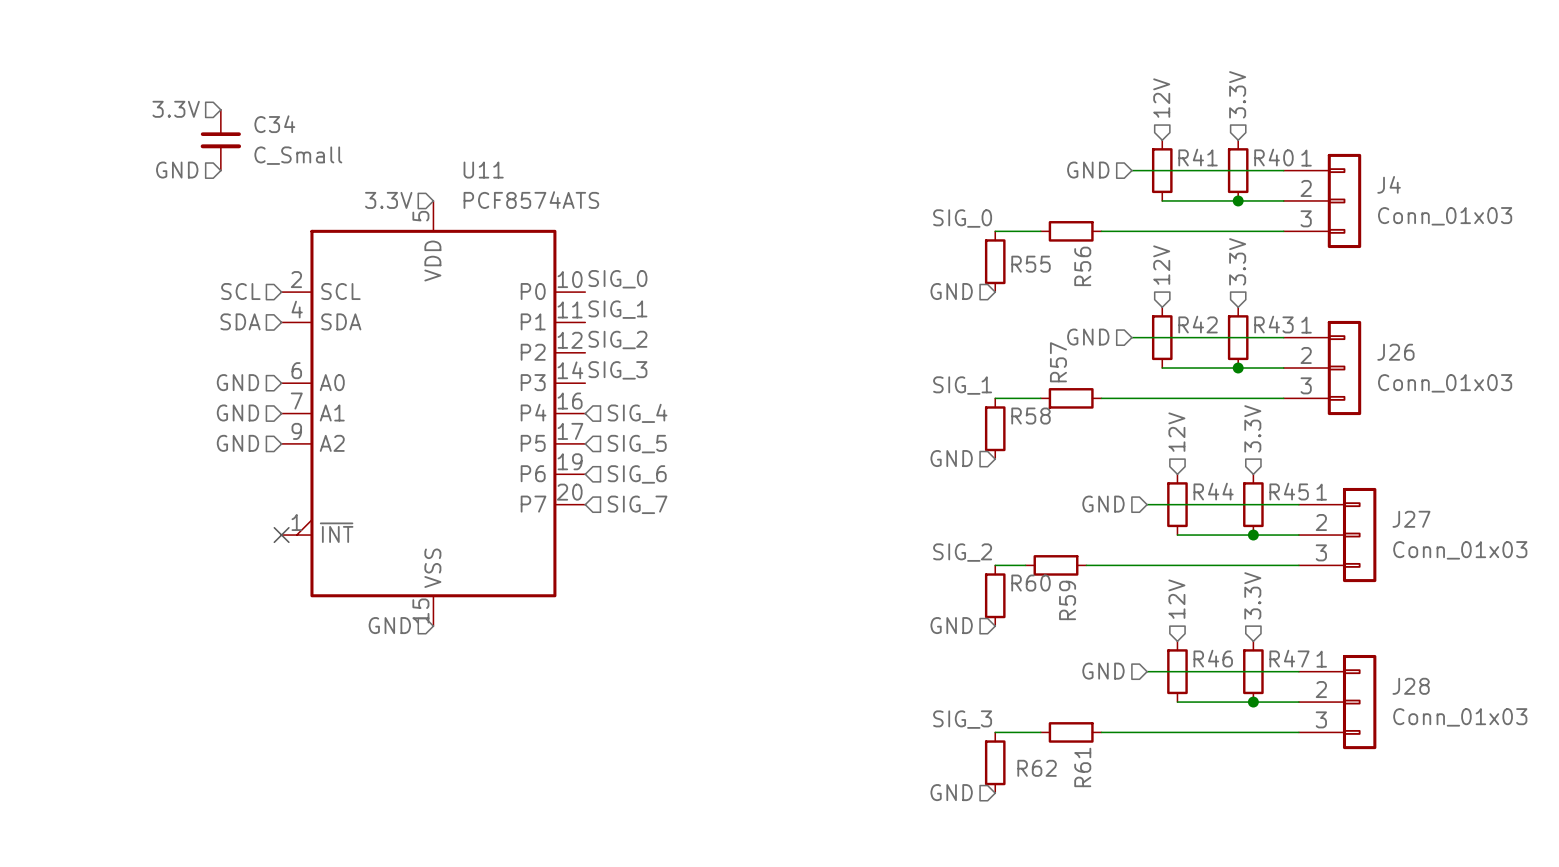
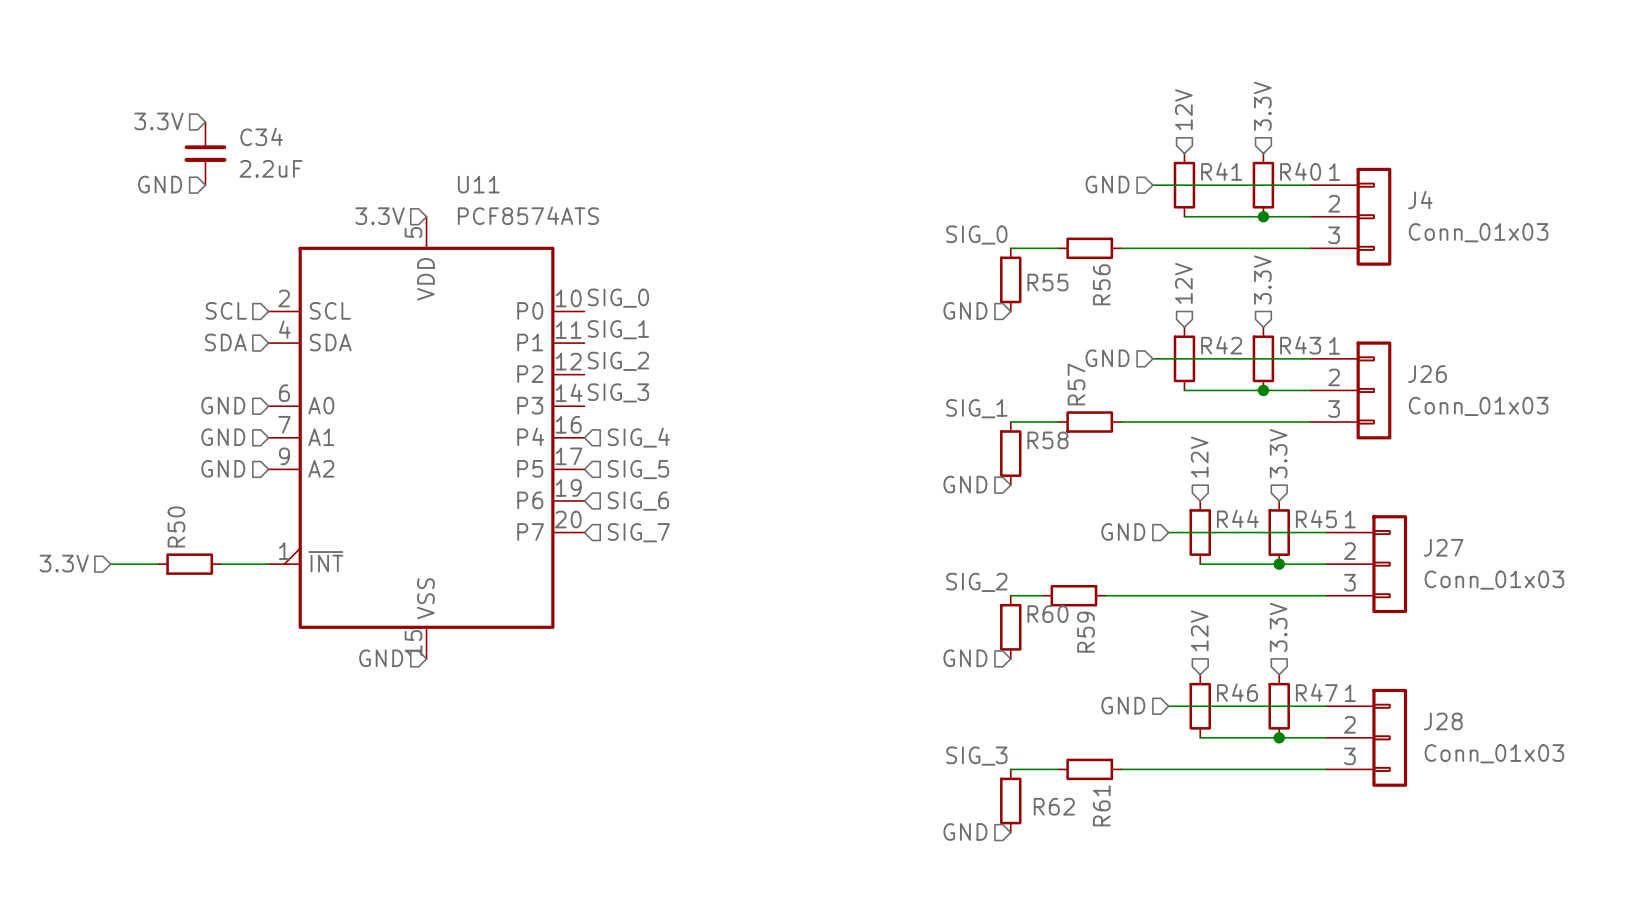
C34 value: C_Small (298, 155) -> 2.2uF (271, 168)
hierarchical label: none -> 3.3V (64, 563)
wire: none -> (110, 564) (158, 564)
R50: none -> (189, 564)
wire: none -> (221, 564) (268, 564)
no-connect mark: (281, 535) -> none

